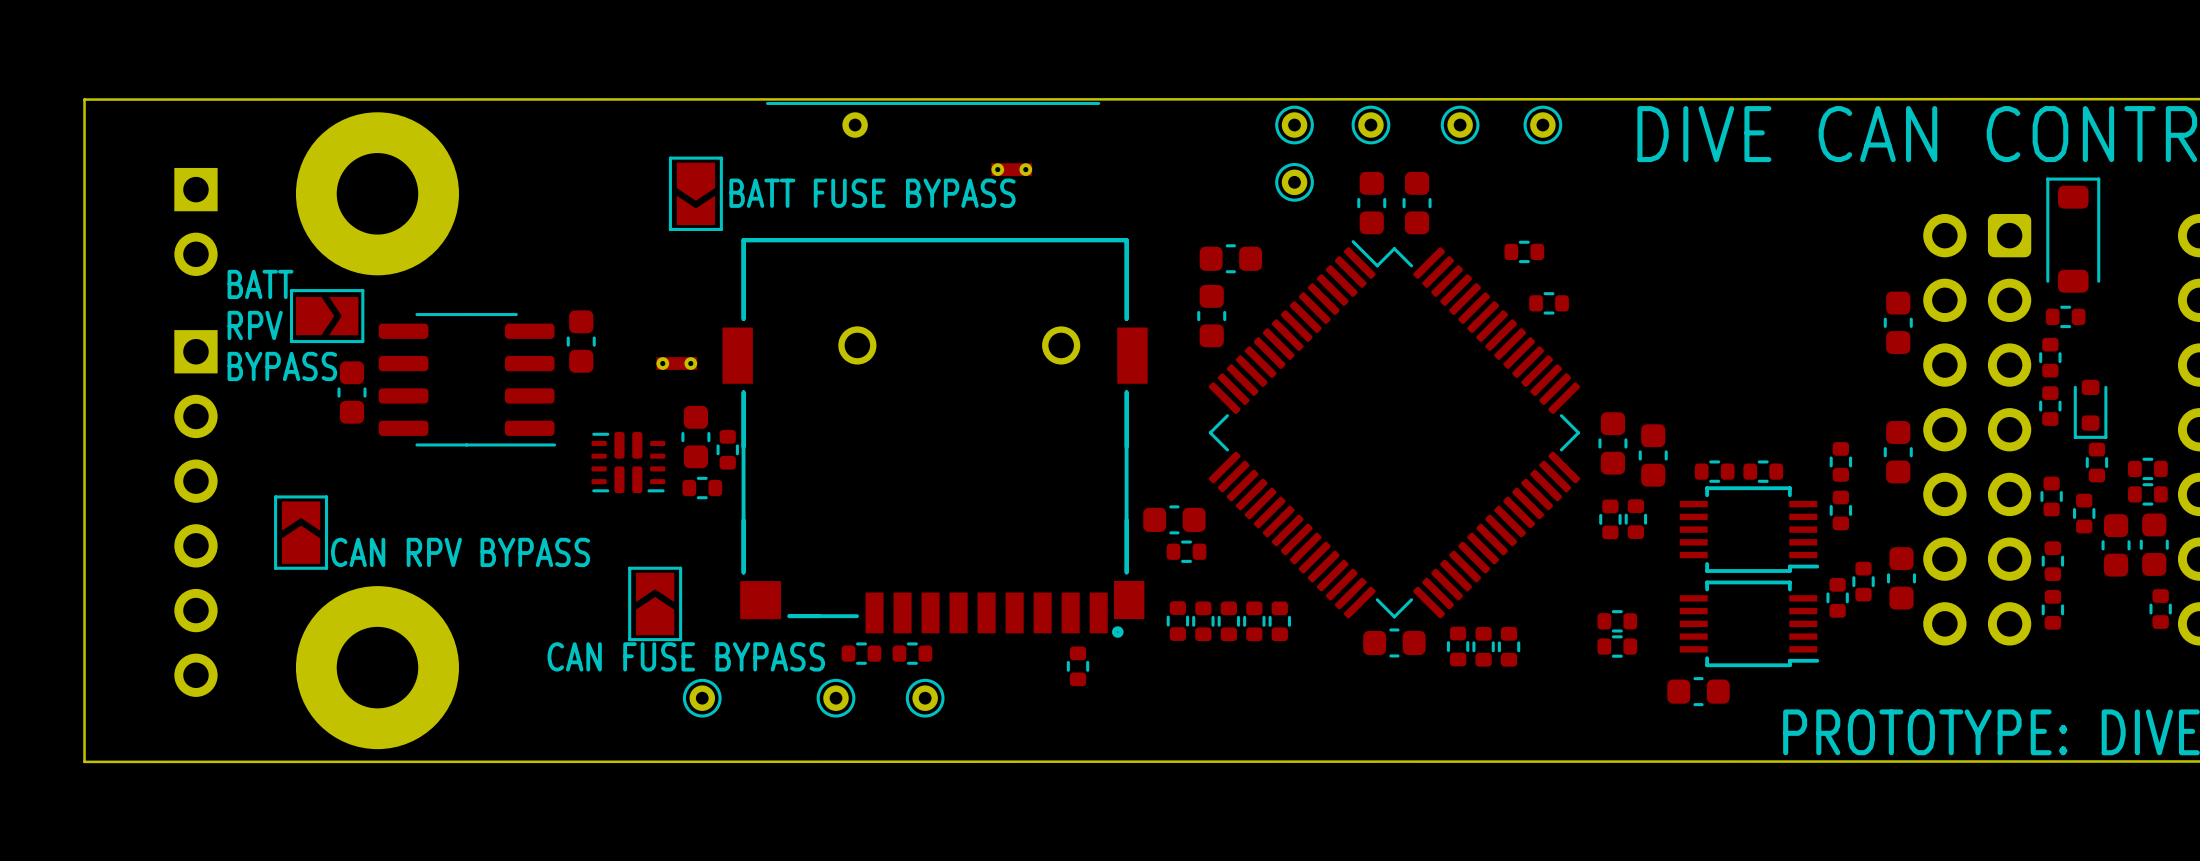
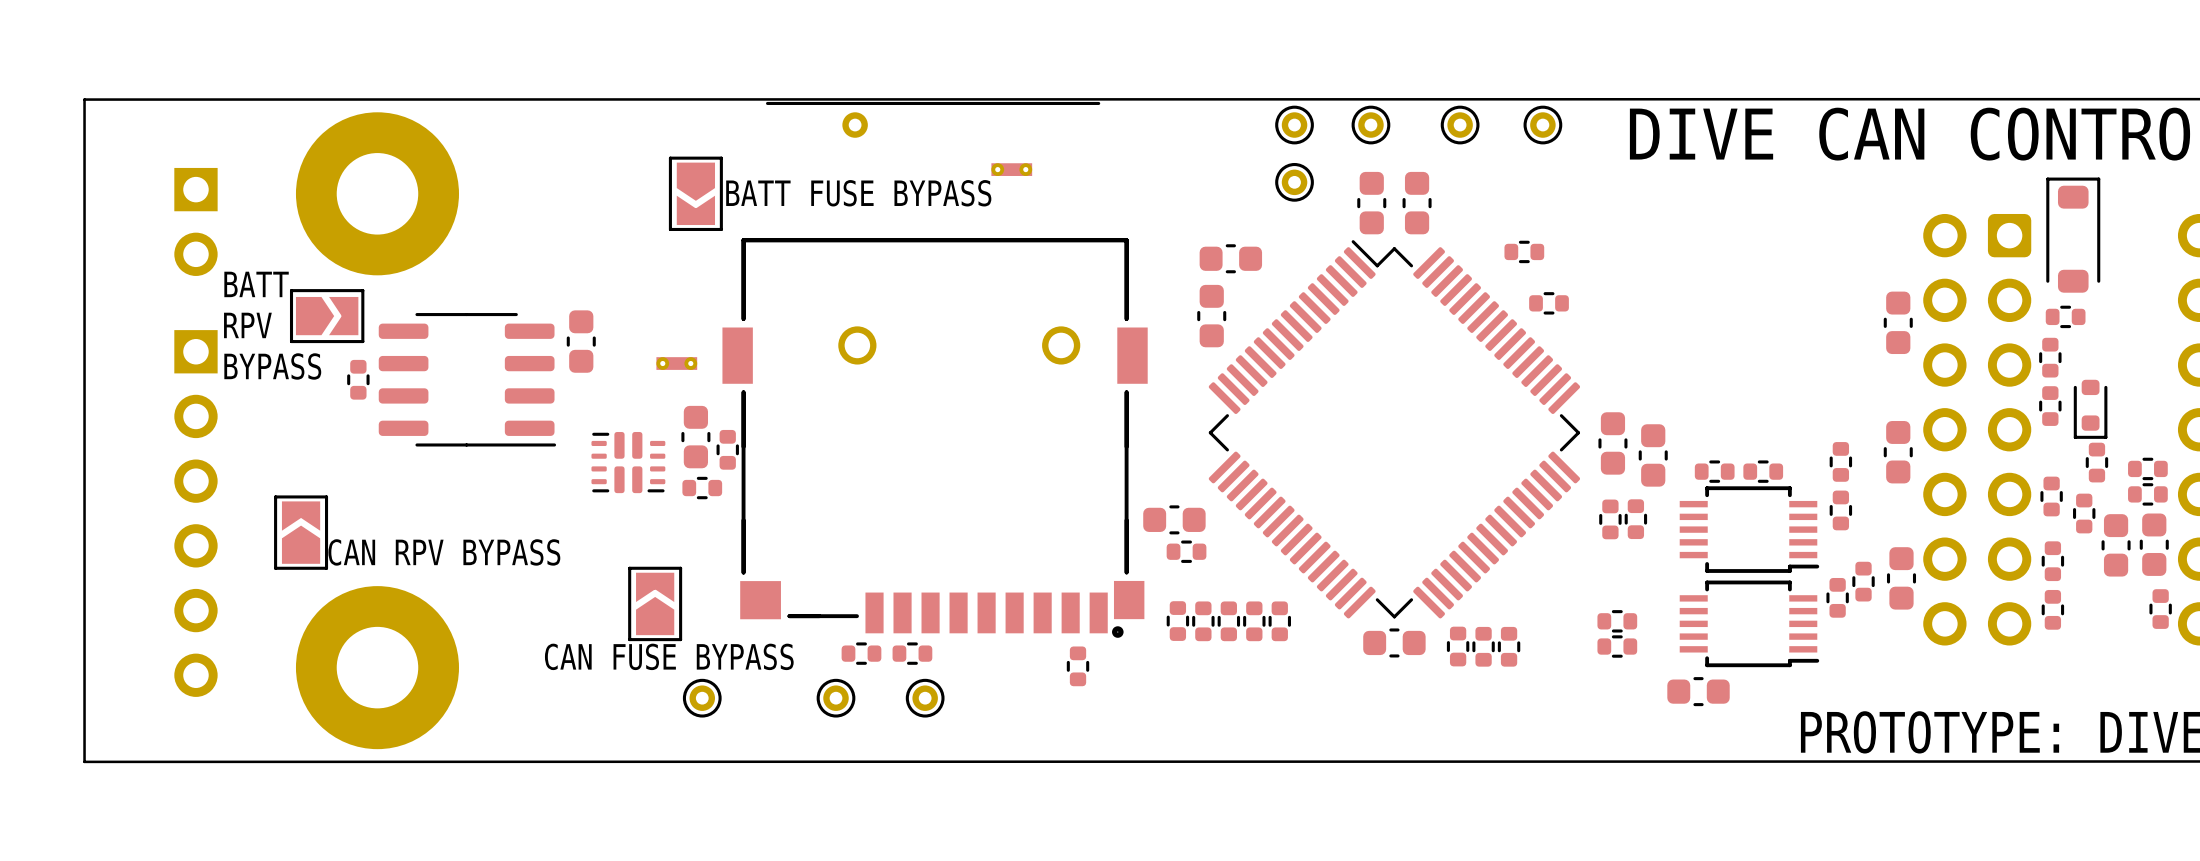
part footprint: [337, 361, 367, 424] -> [347, 359, 370, 400]

